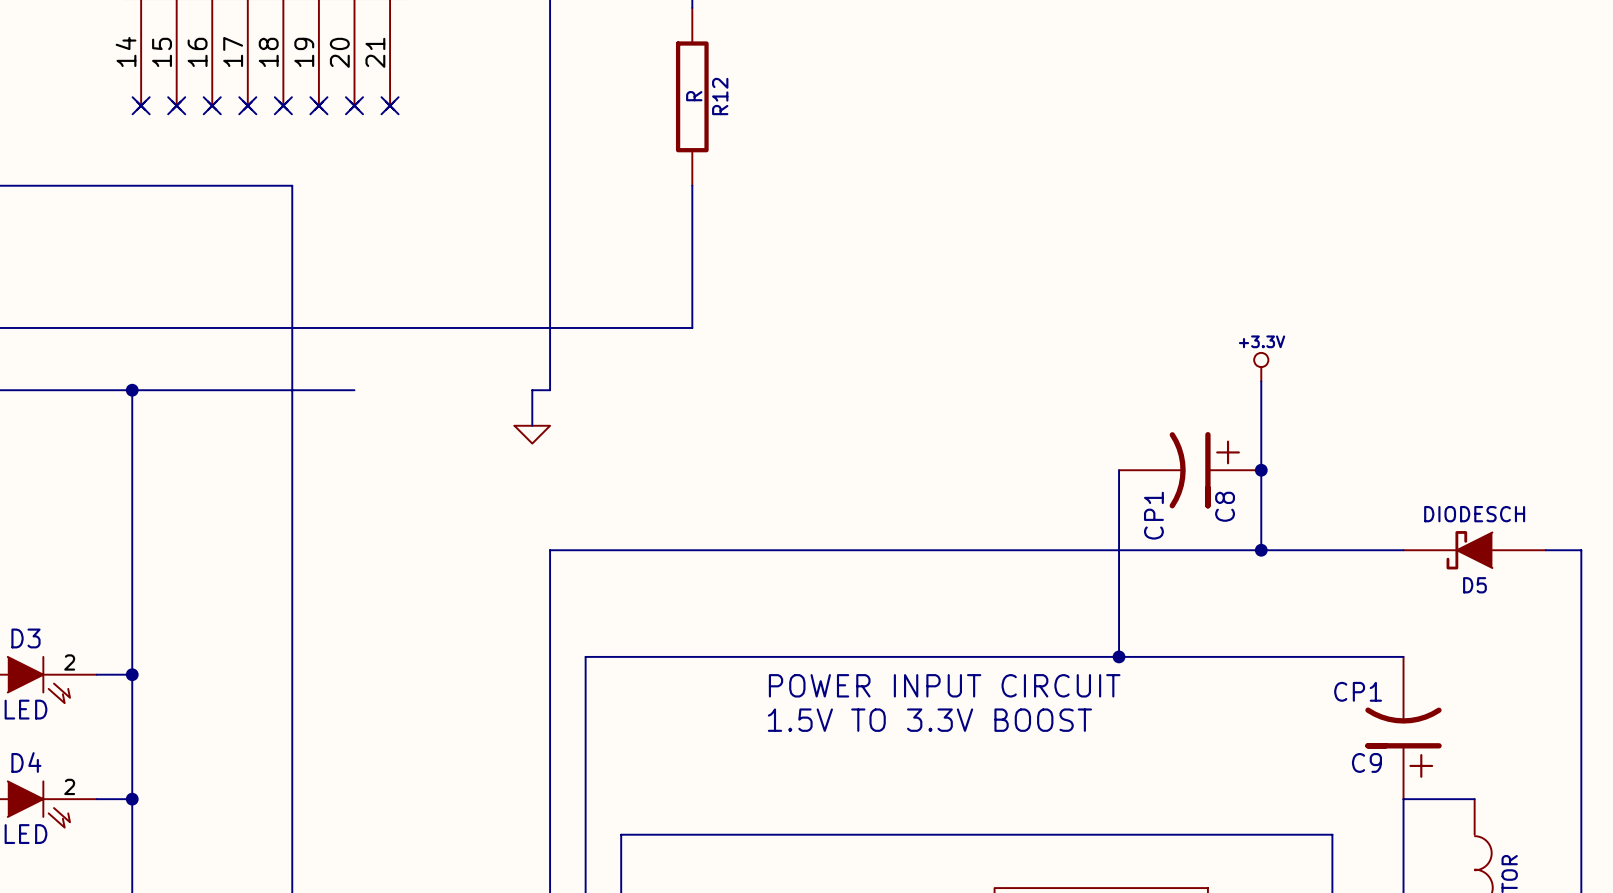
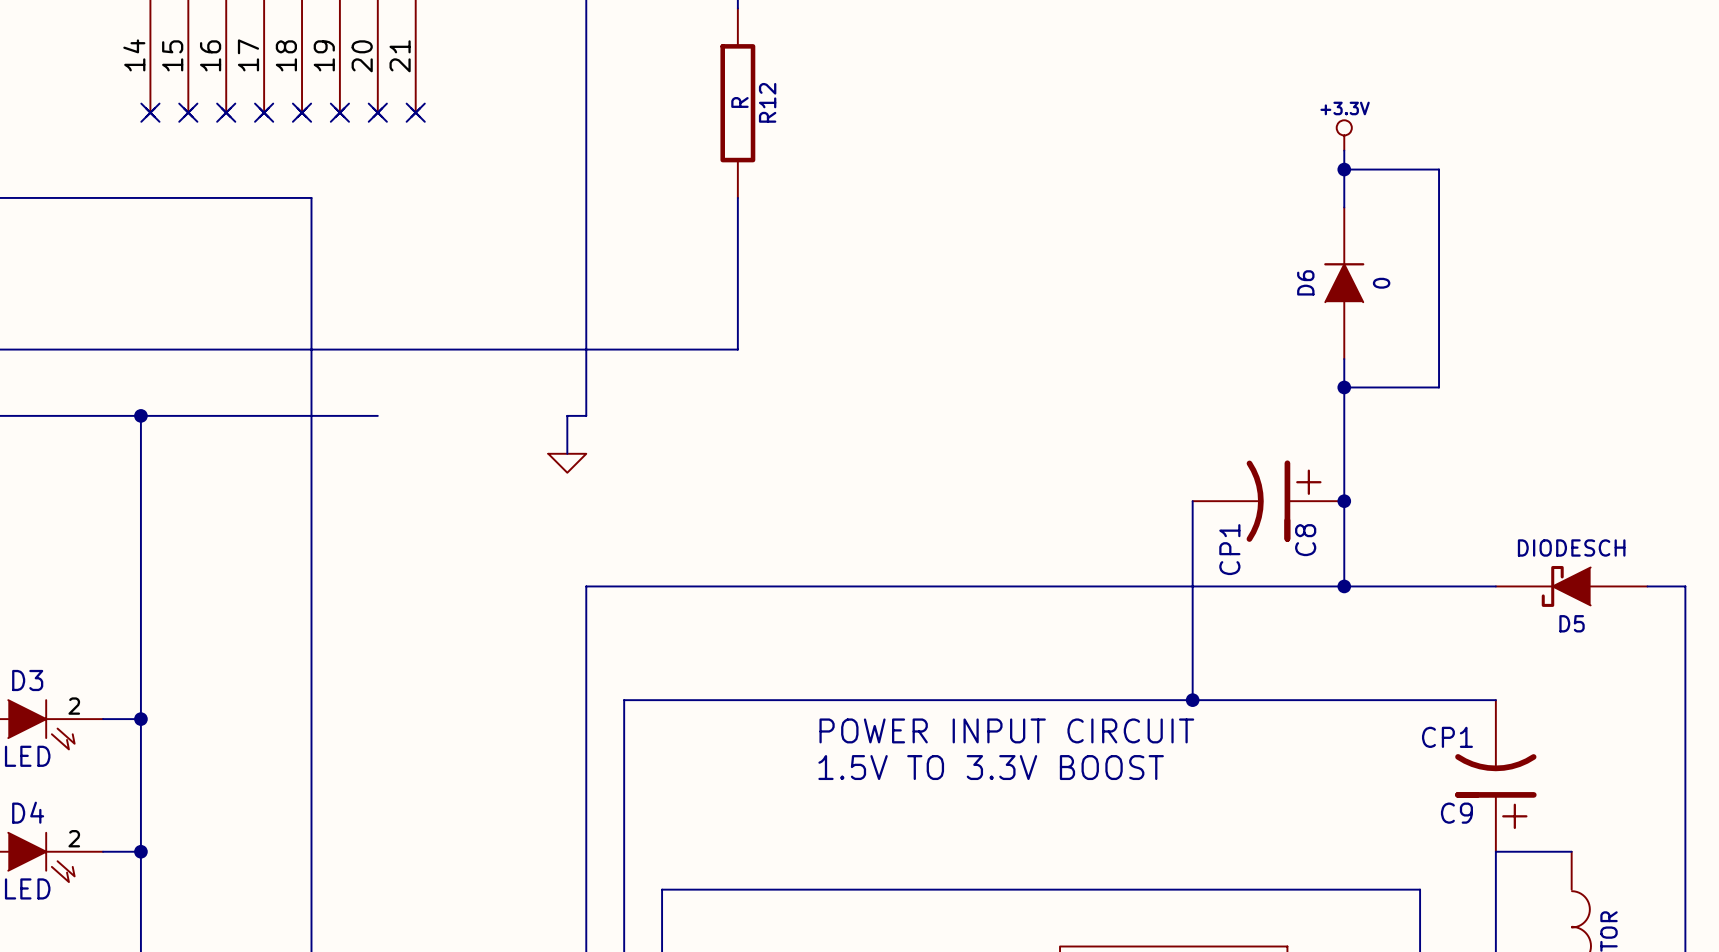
wire: none -> (1344, 150) (1344, 207)
wire: none -> (1344, 169) (1439, 169) (1439, 387) (1344, 387)
junction: none -> (1344, 169)
D6: none -> 0 (1344, 283)
wire: none -> (1344, 359) (1344, 406)
junction: none -> (1344, 387)
power symbol position: +3.3V (1261, 367) -> +3.3V (1344, 135)

